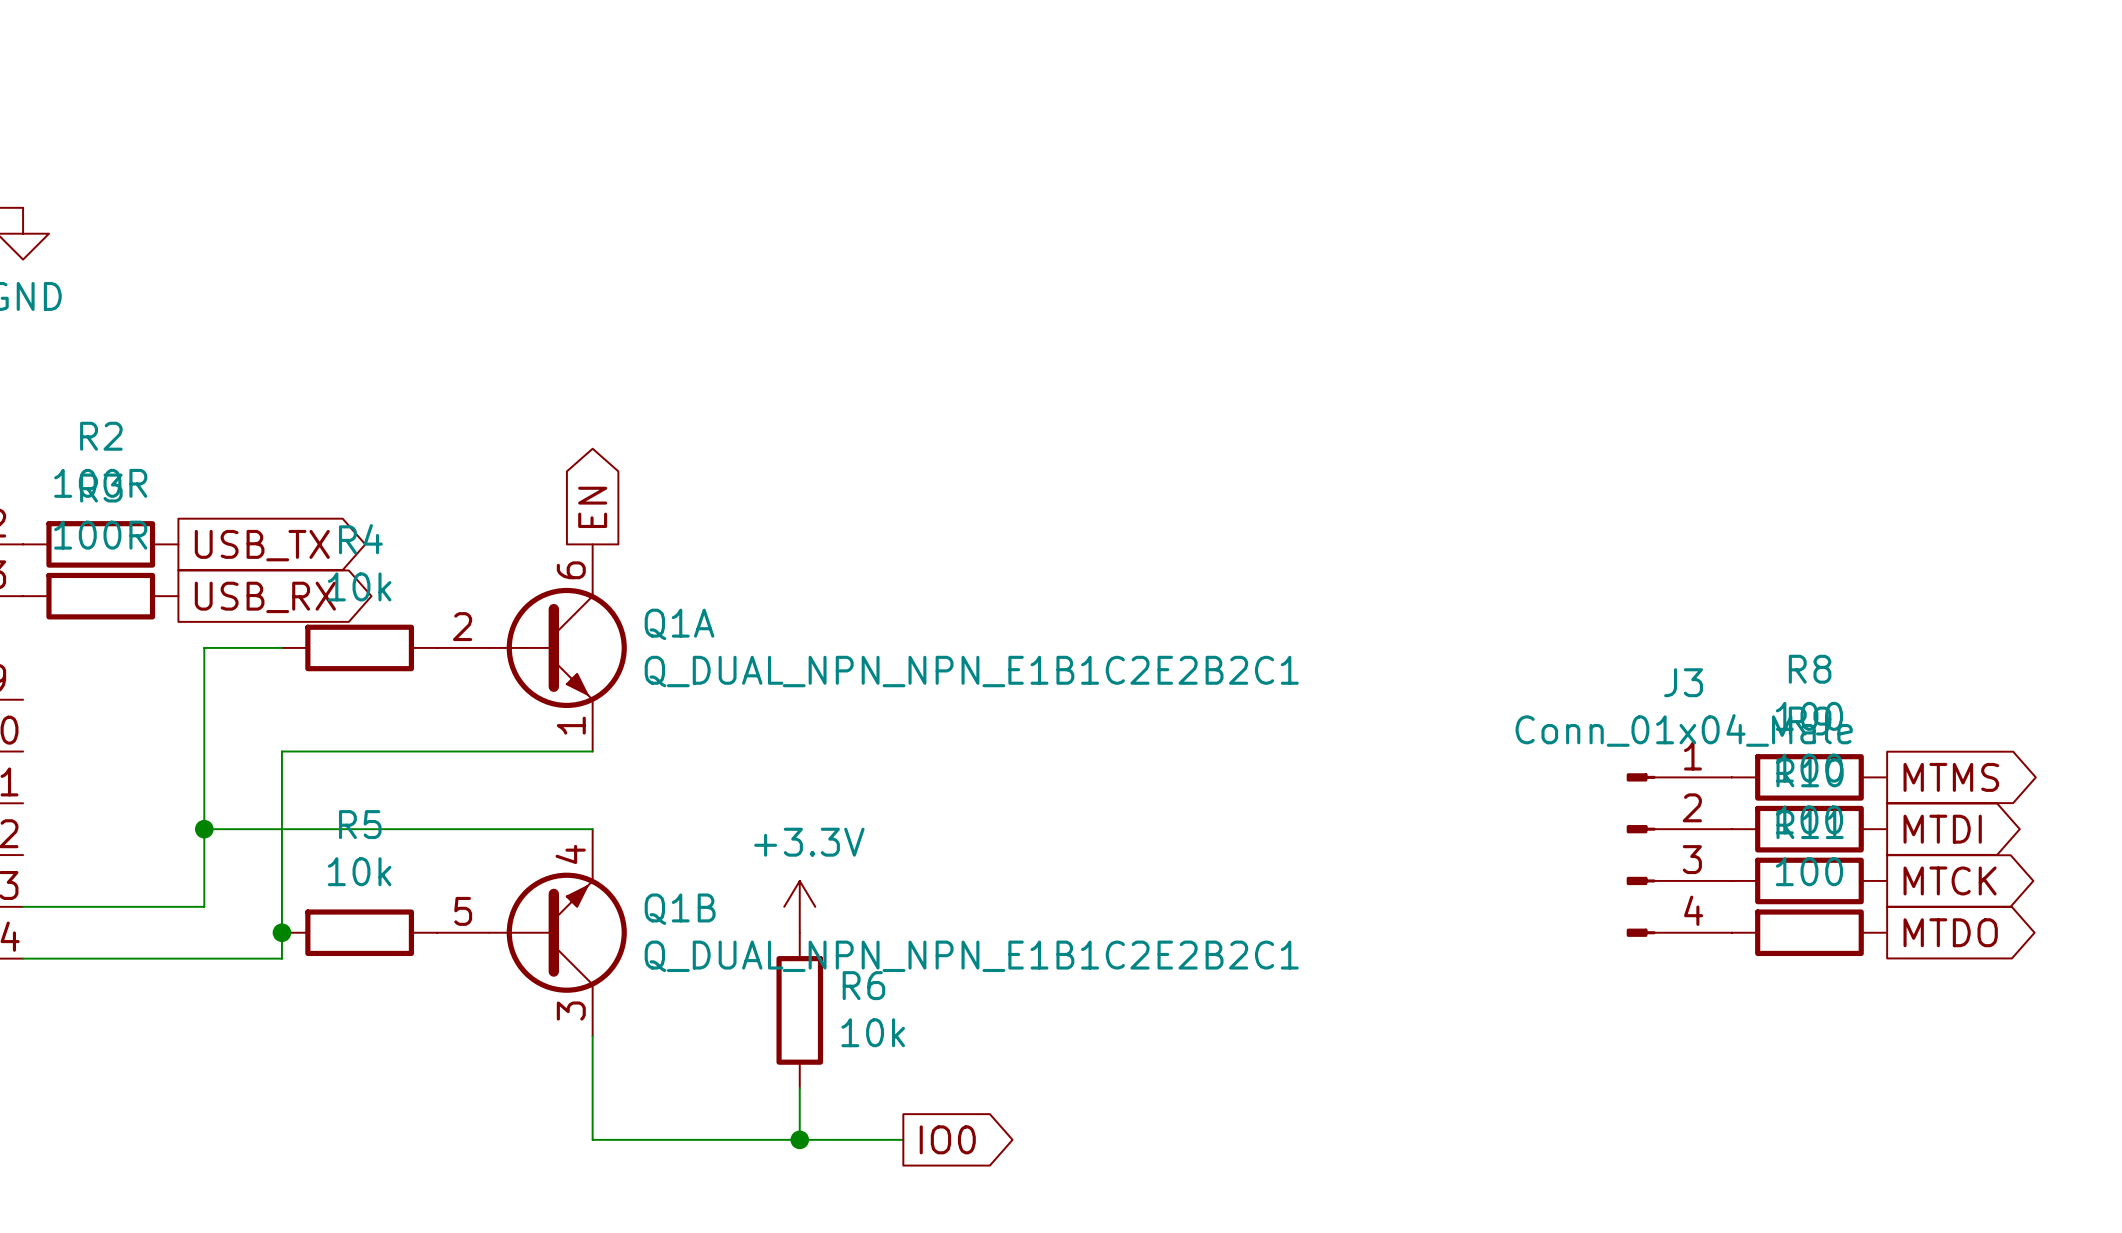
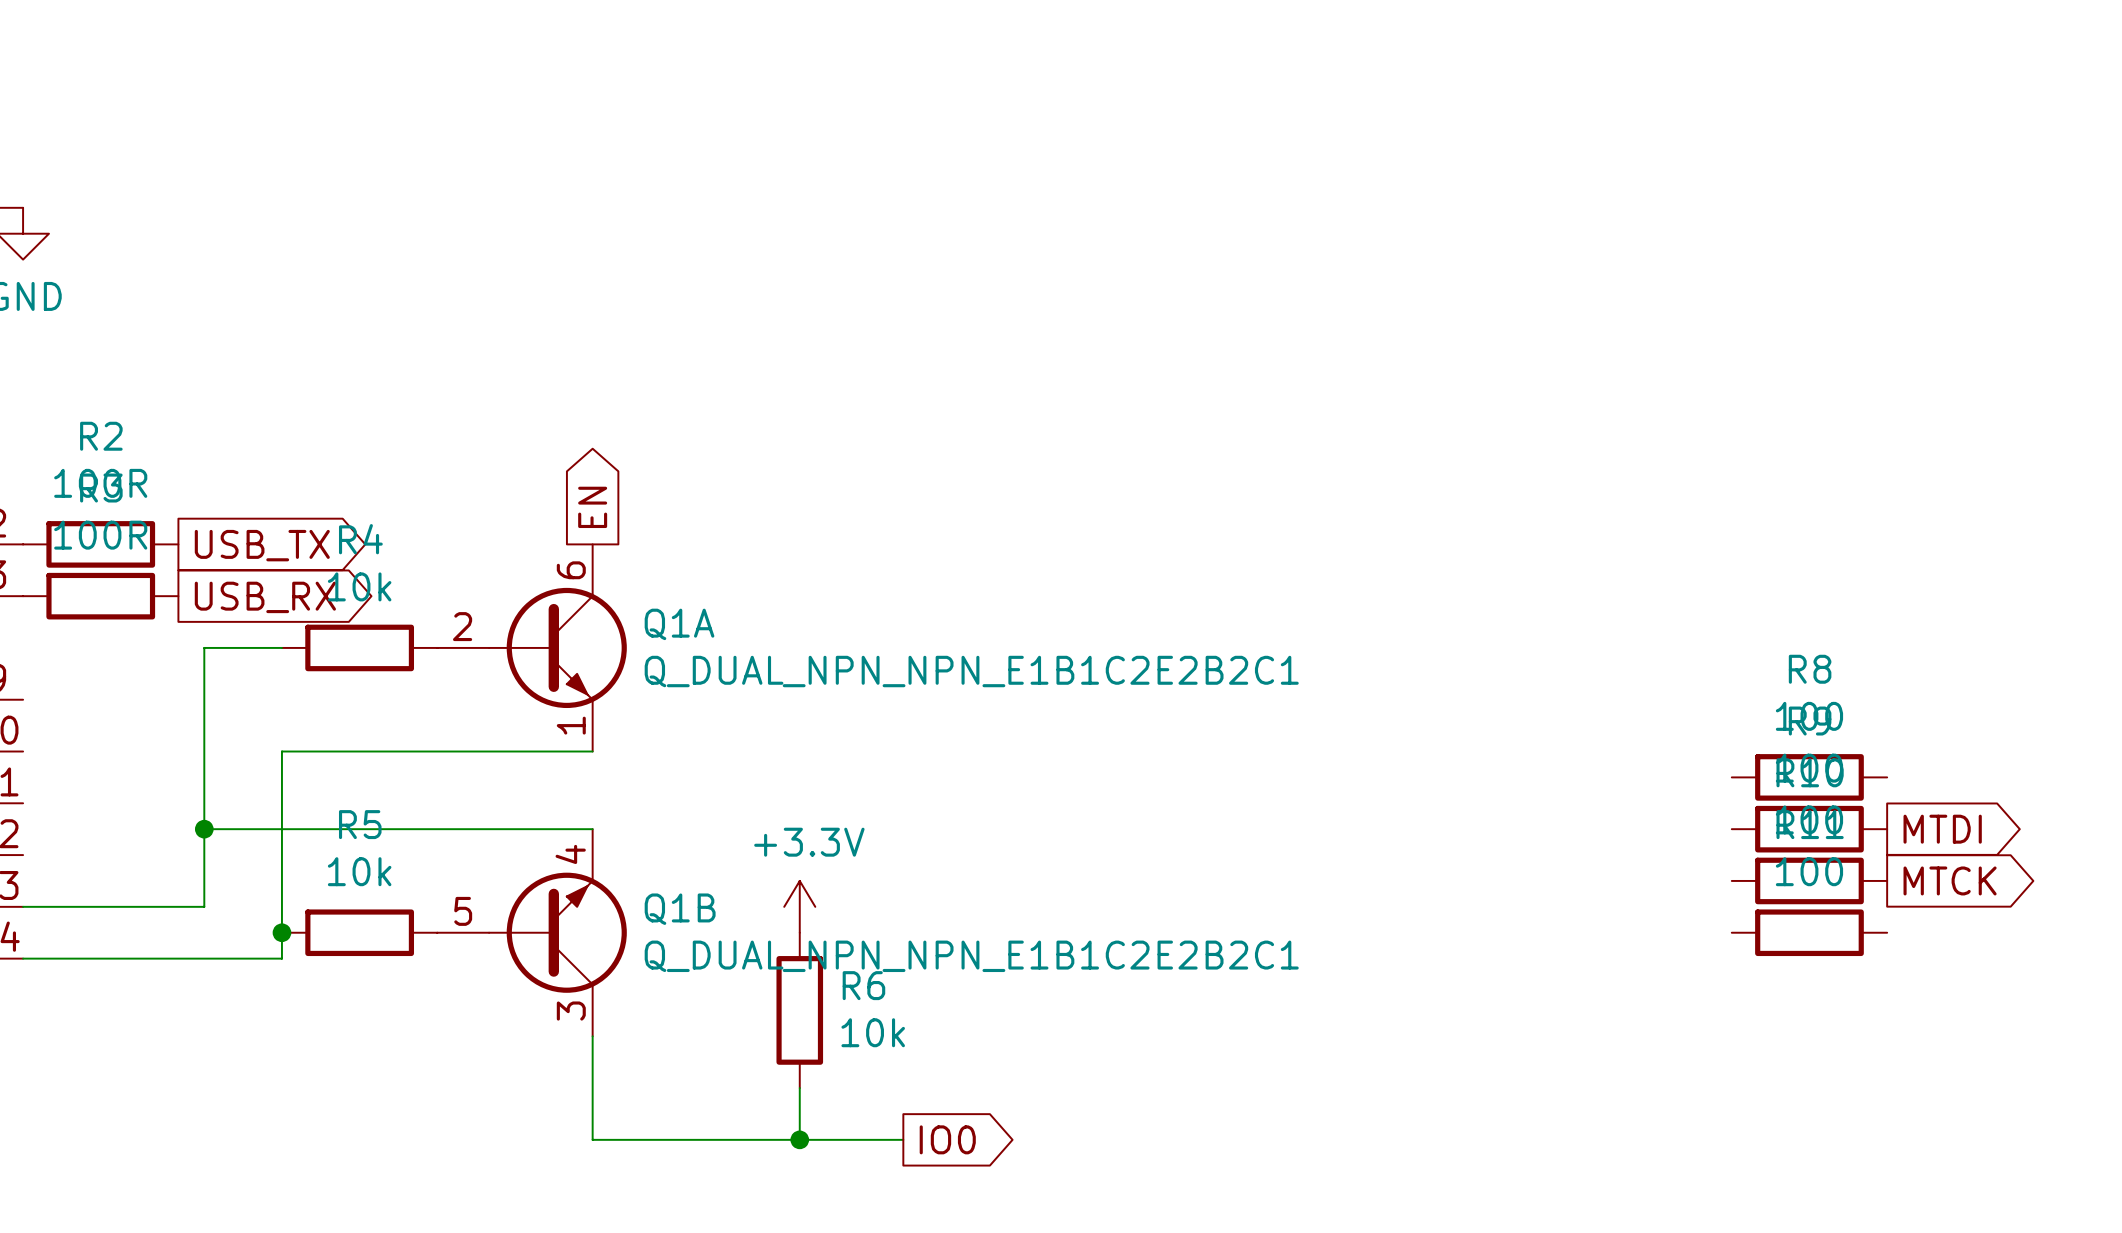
global label: MTMS (1951, 777) -> none
J3: Conn_01x04_Male (1679, 855) -> none
global label: MTDO (1950, 932) -> none

